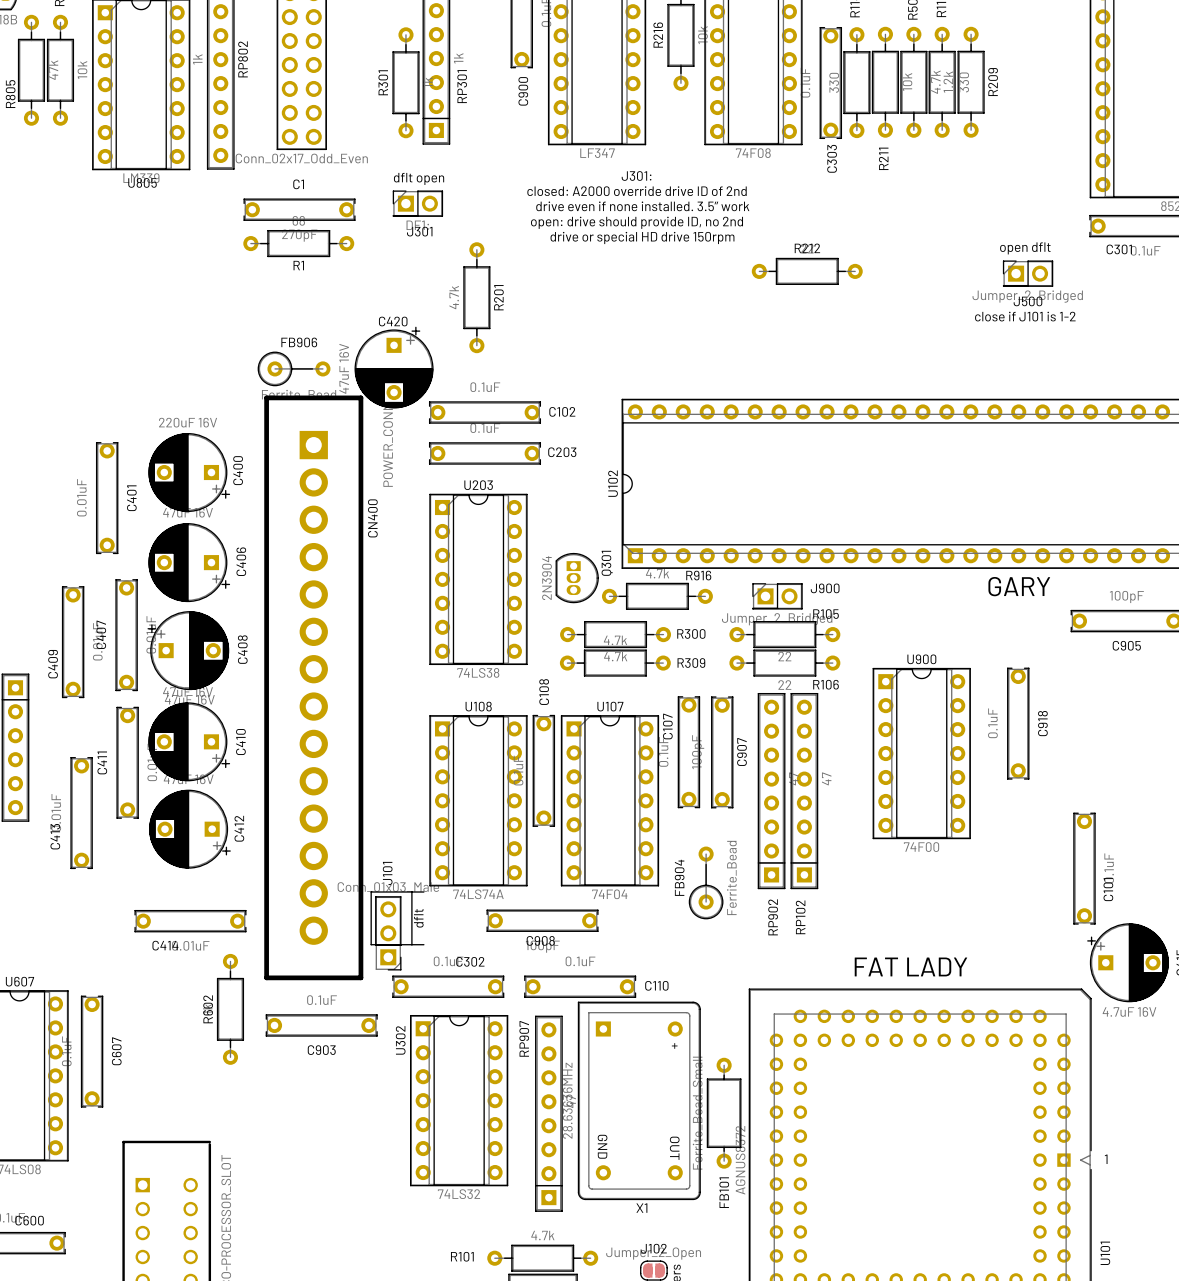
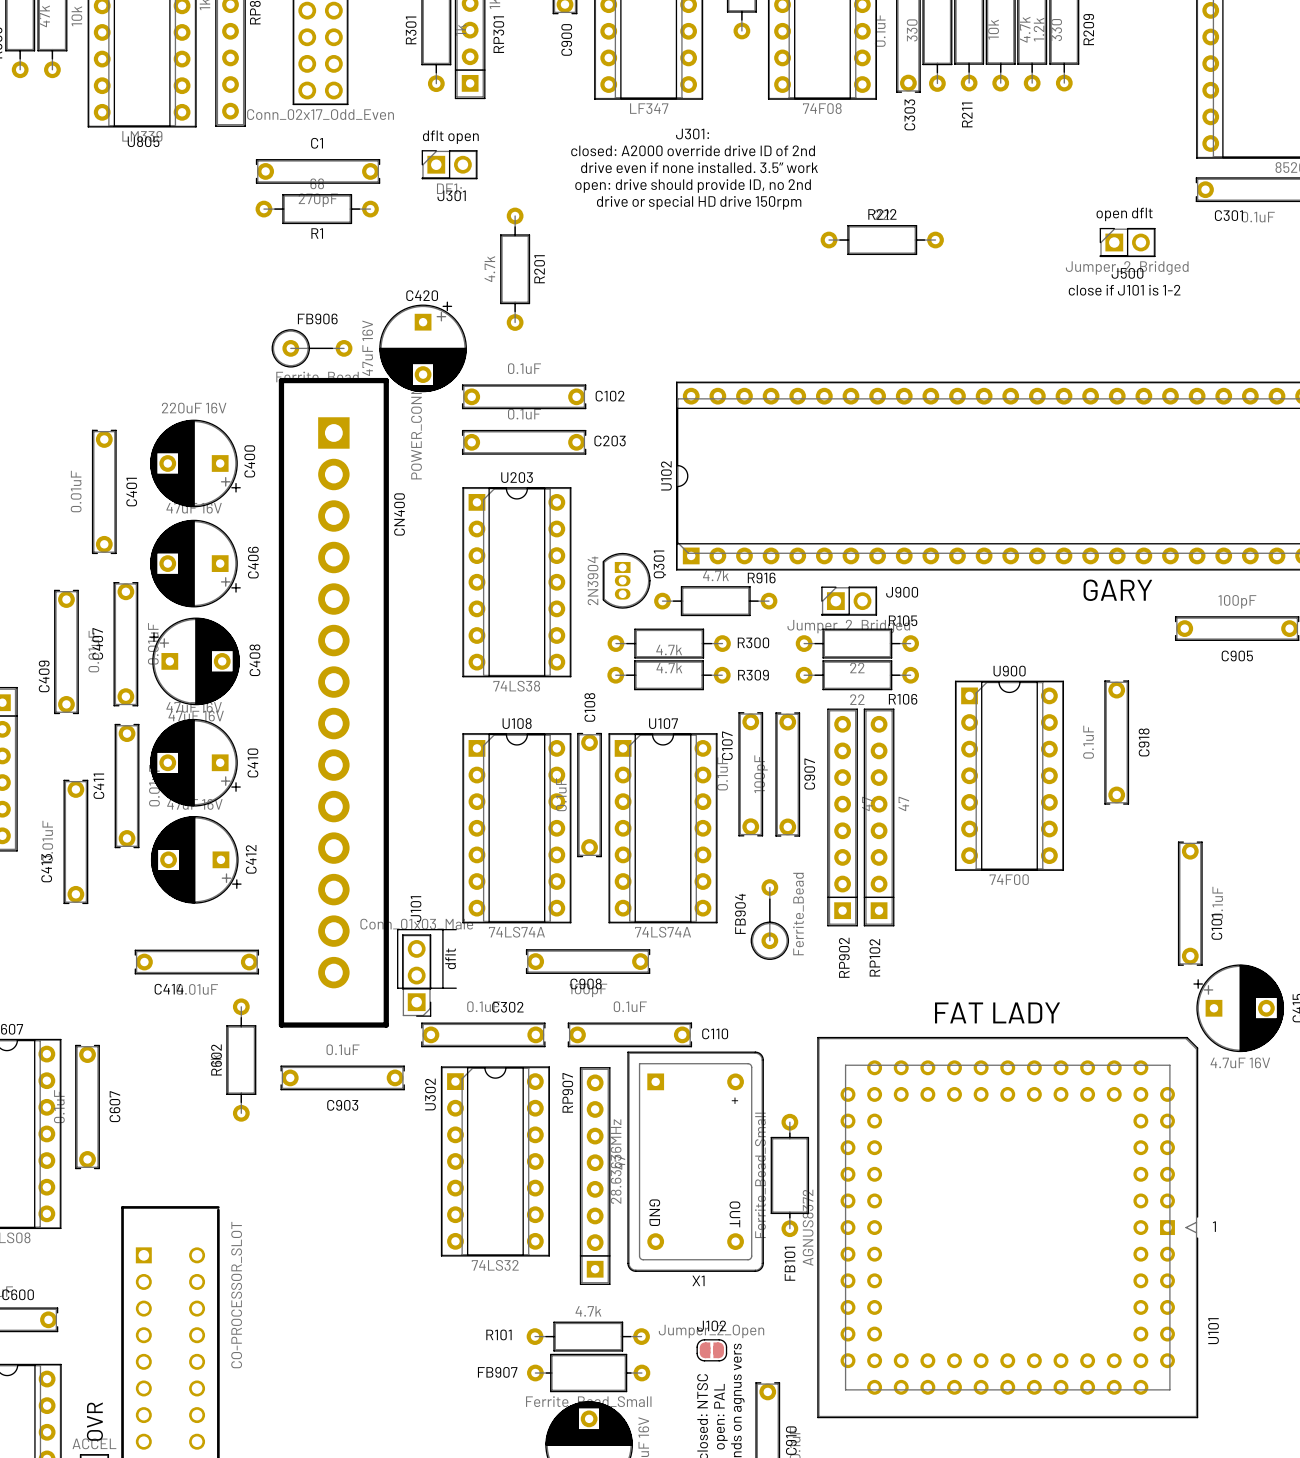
U107 value: 74F04 (609, 894) -> 74LS74A (663, 932)

